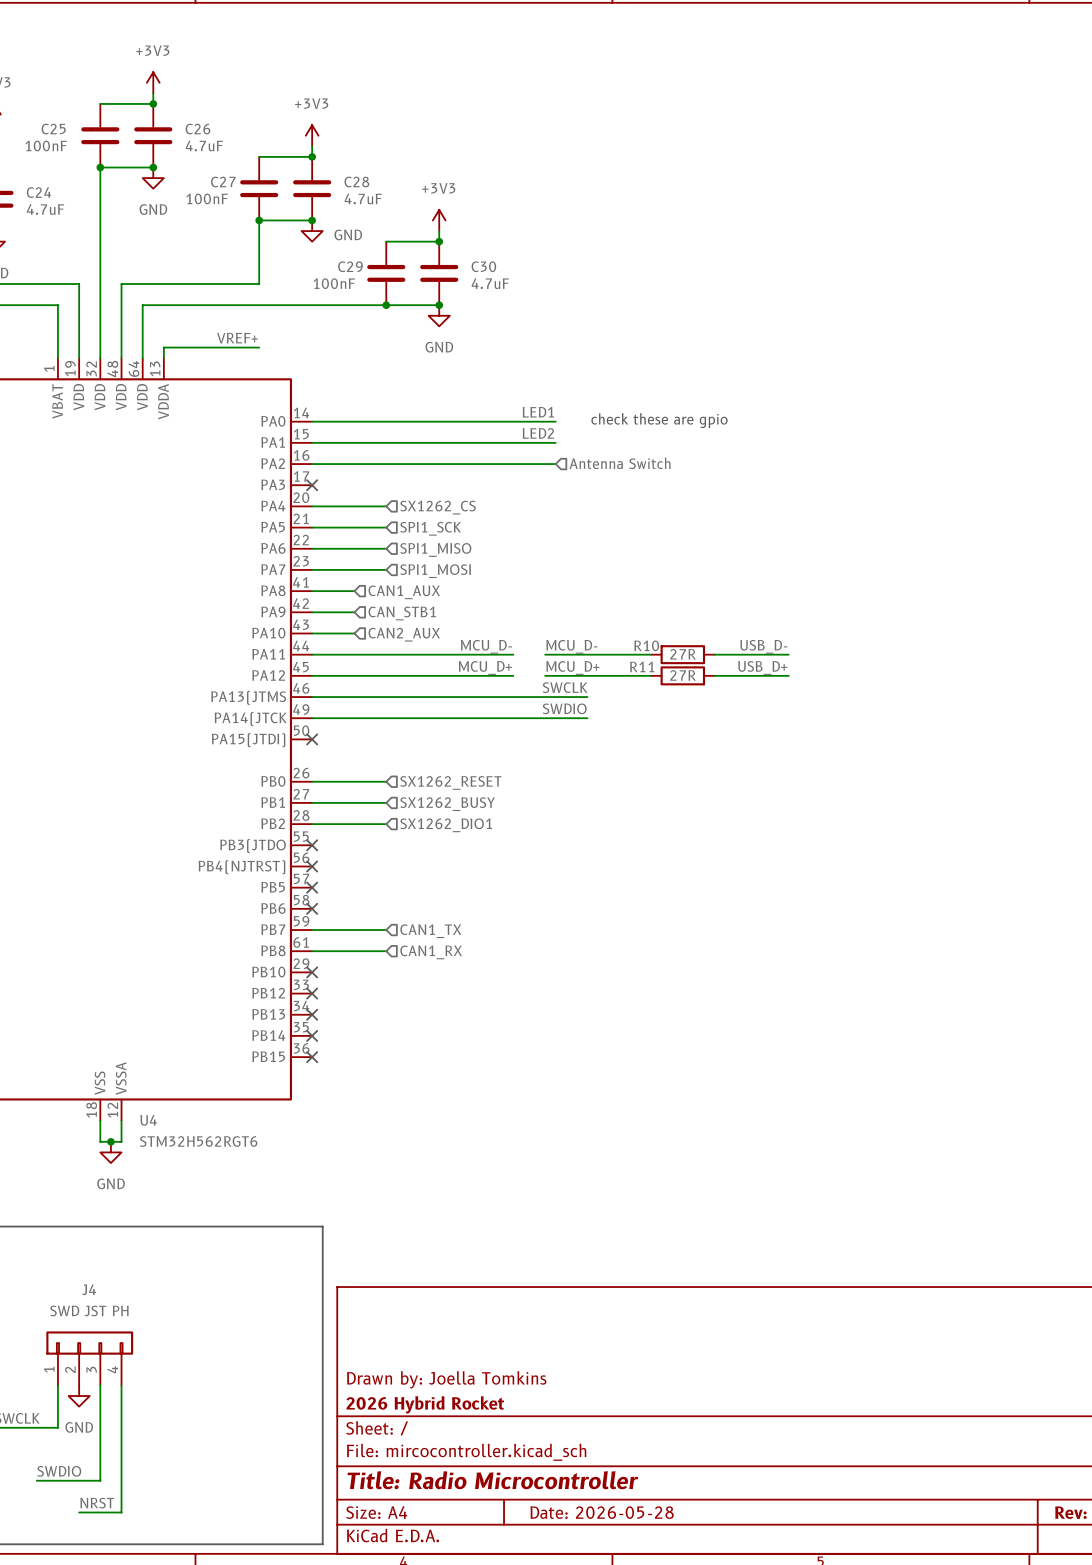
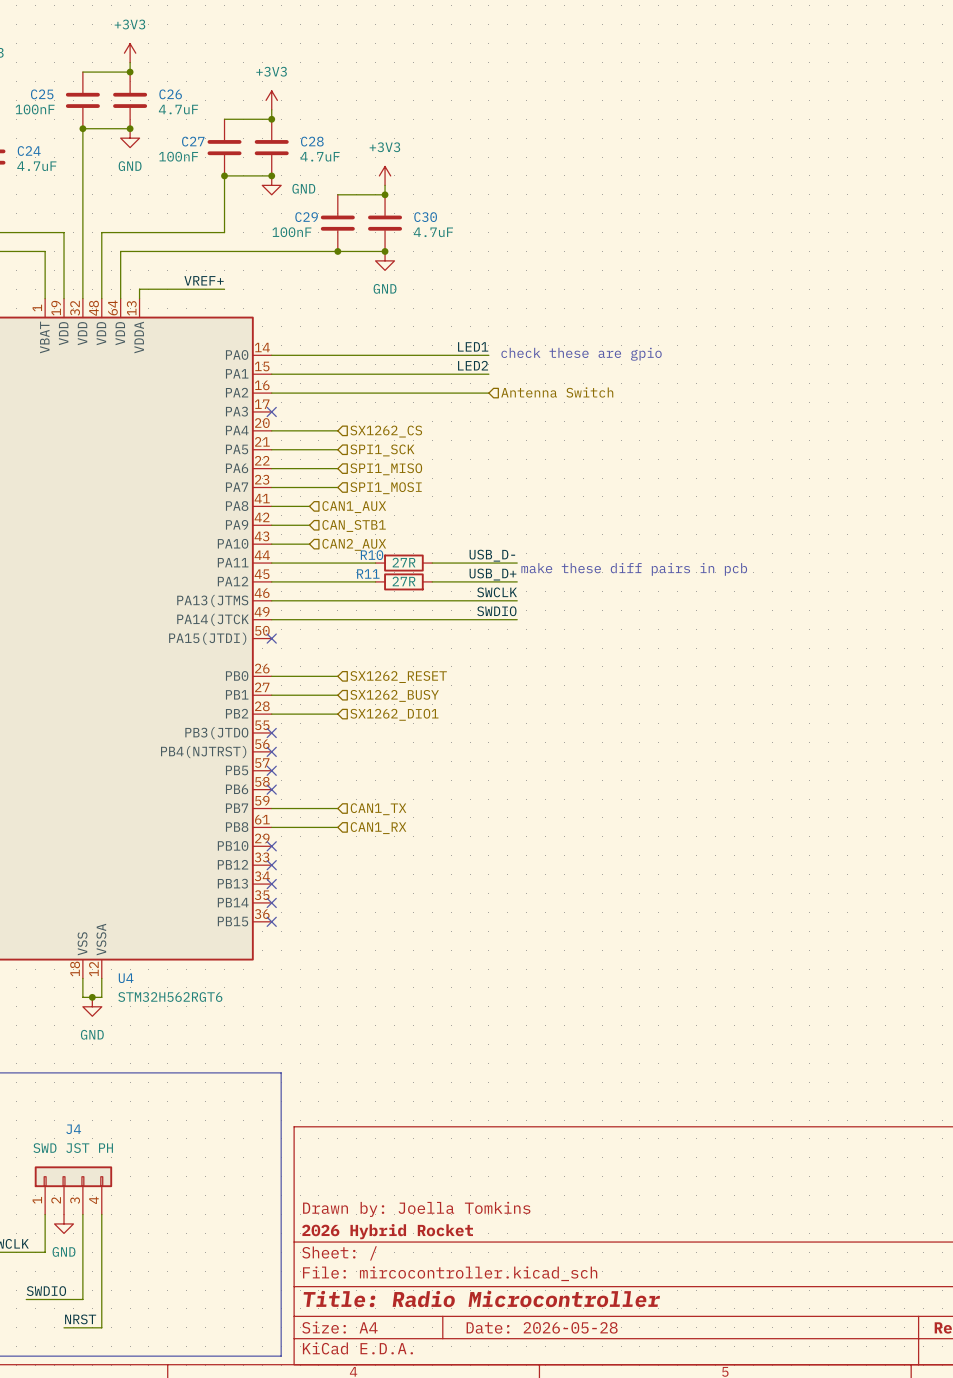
label: MCU_D- (486, 646) -> none
label: MCU_D- (571, 646) -> none
label position: USB_D- (763, 646) -> USB_D- (492, 555)
wire: (428, 654) (492, 654) -> none
wire: none -> (451, 563) (479, 563)
wire: (587, 654) (651, 654) -> none
R10 position: (682, 654) -> (403, 563)
wire: (714, 654) (788, 654) -> none
text: none -> make these diff pairs in pcb (634, 569)
label: MCU_D+ (485, 667) -> none
label: MCU_D+ (572, 667) -> none
label position: USB_D+ (762, 667) -> USB_D+ (492, 574)
wire: (428, 675) (492, 675) -> none
wire: none -> (451, 581) (479, 581)
wire: (587, 675) (651, 675) -> none
R11 position: (682, 675) -> (403, 581)
wire: (714, 675) (788, 675) -> none

